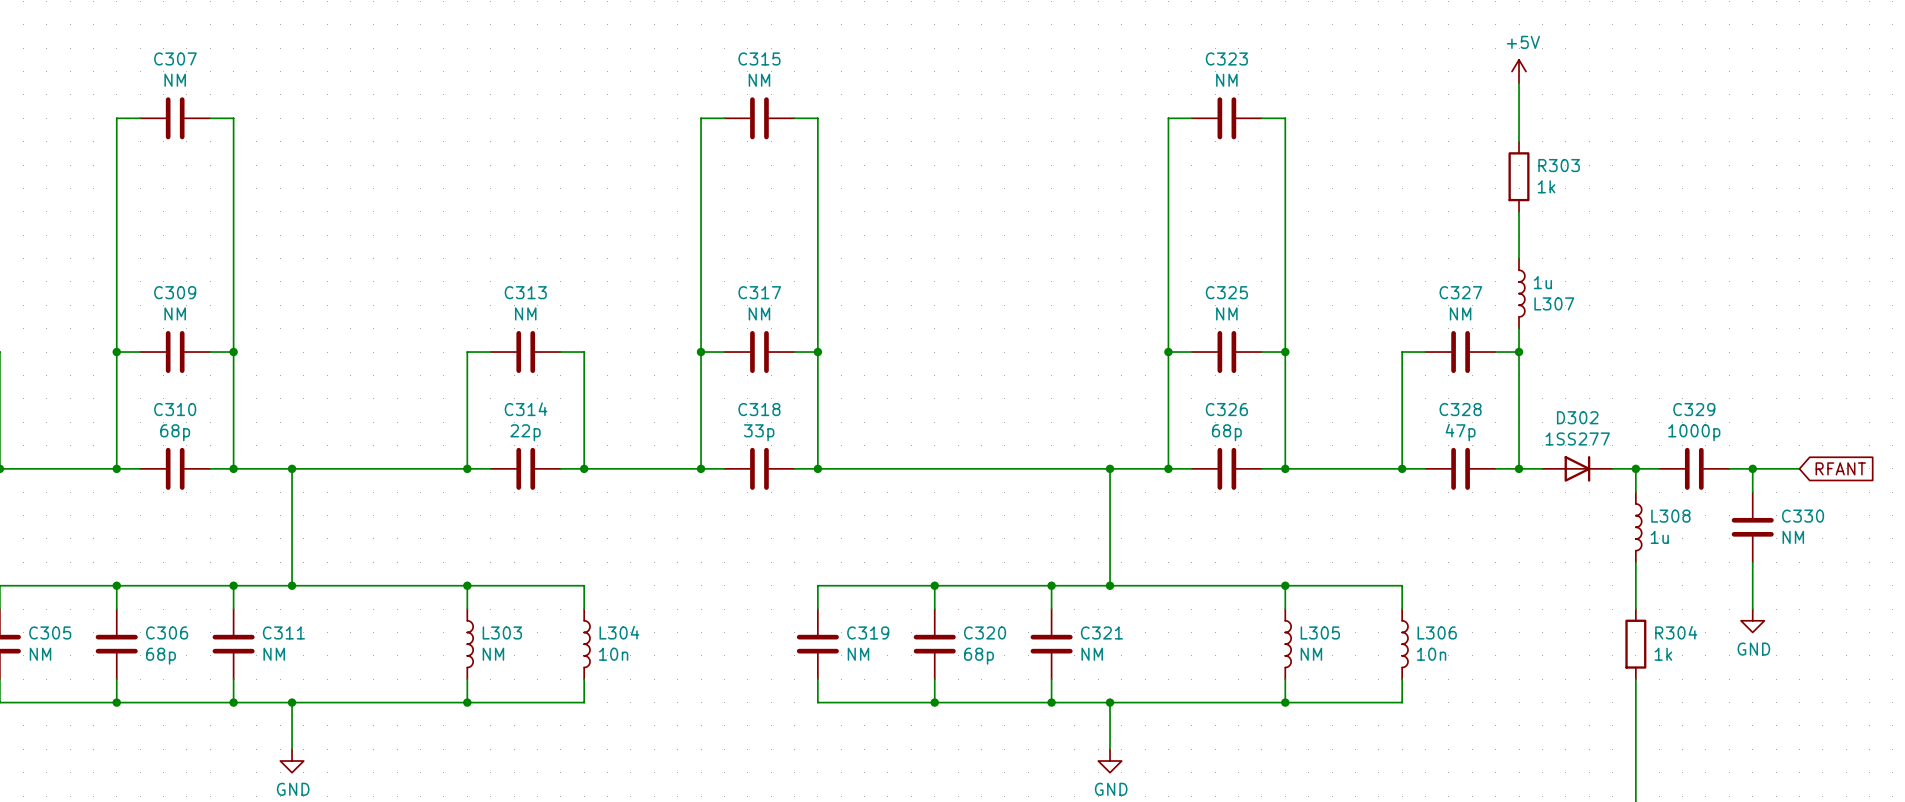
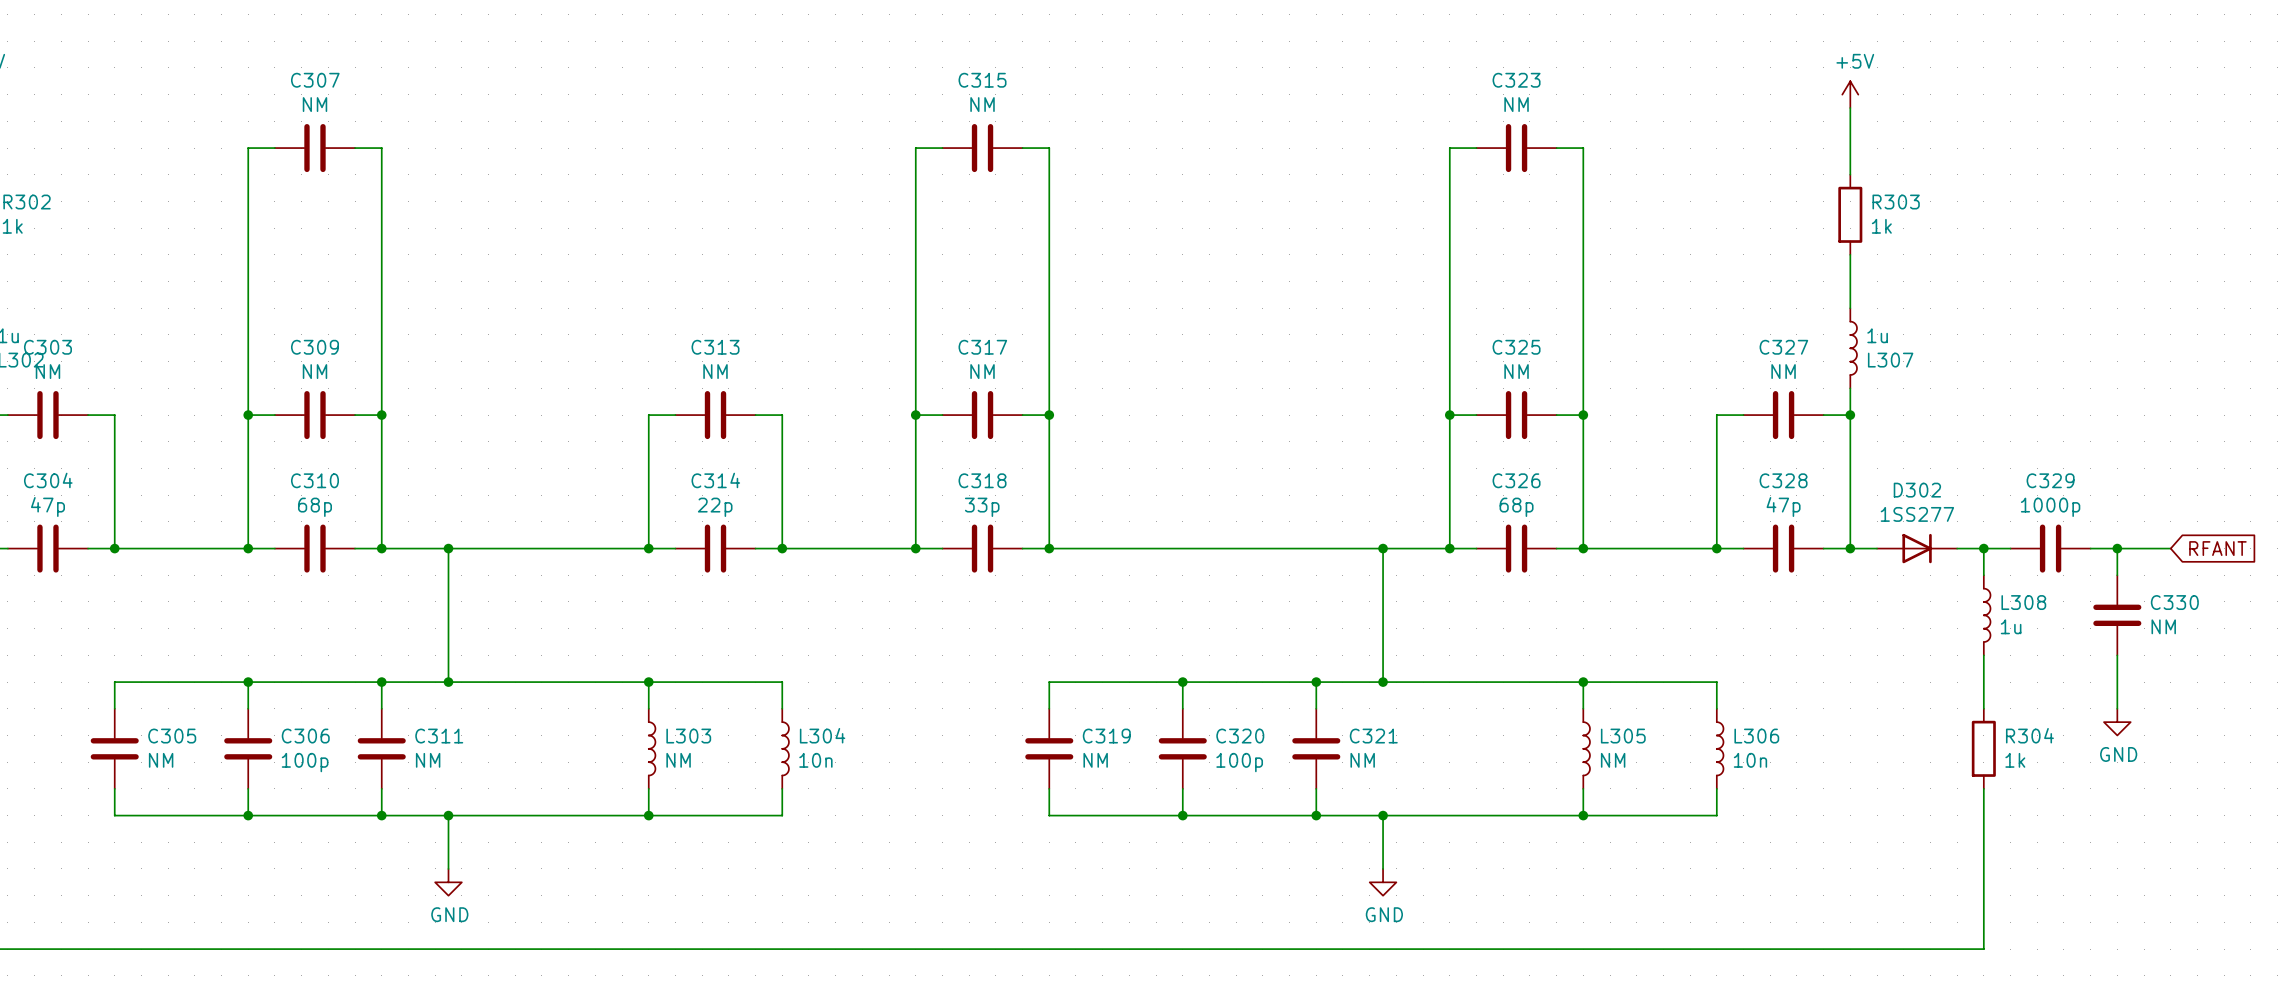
C306 value: 68p (160, 656) -> 100p (305, 762)
C320 value: 68p (978, 656) -> 100p (1239, 762)

